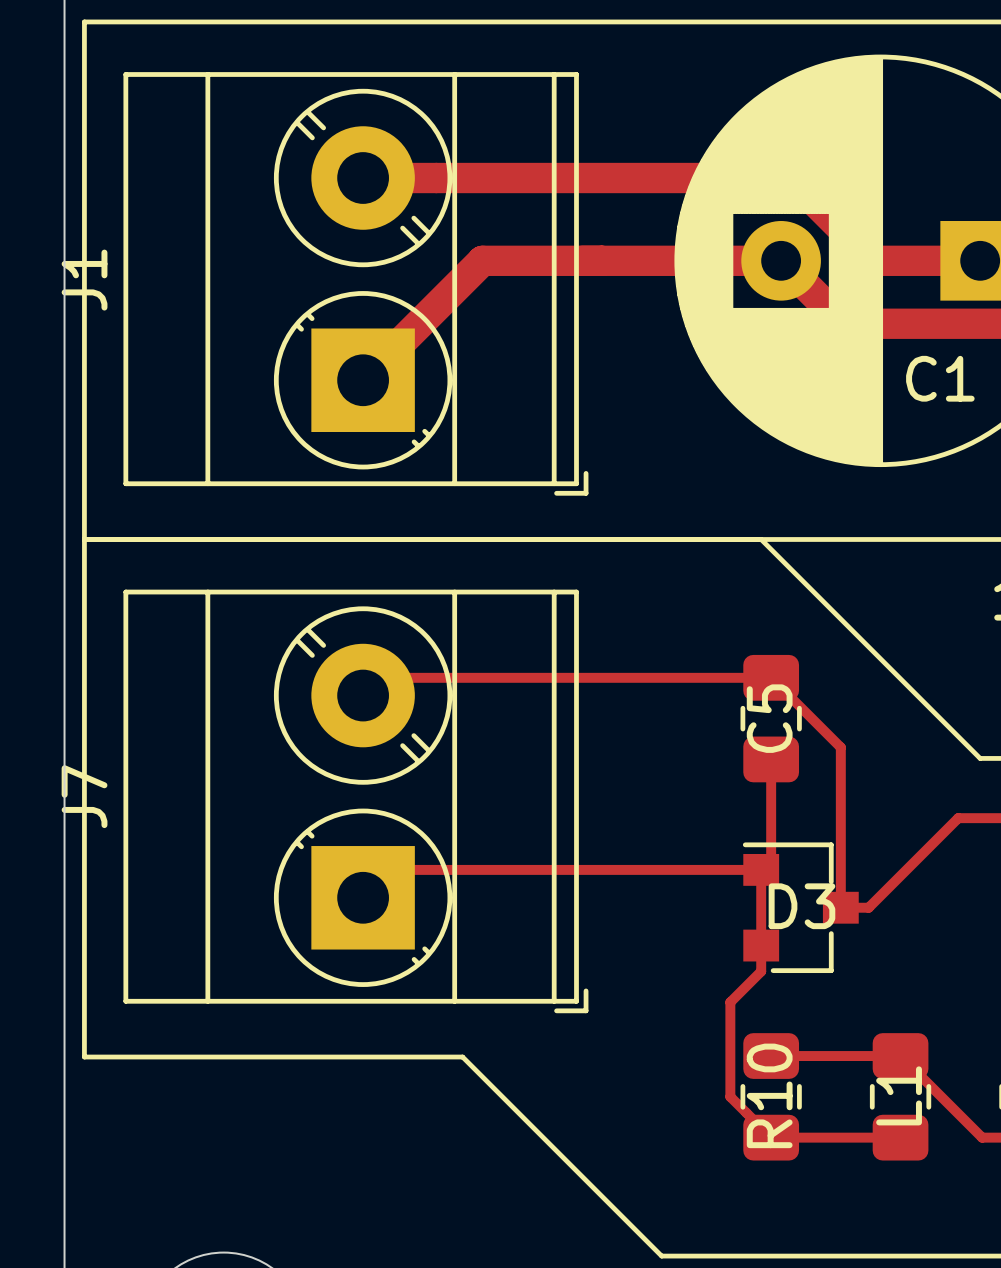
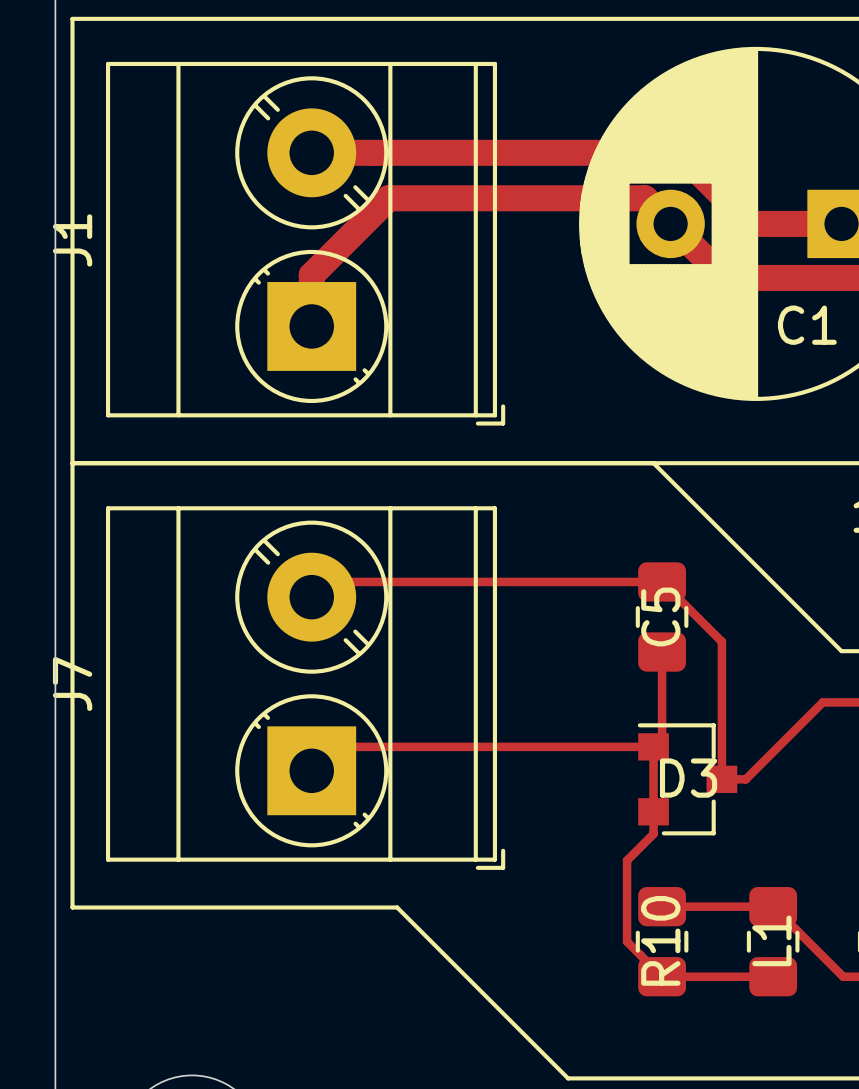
top track: (781, 260) (482, 260) (363, 380) -> (670, 223) (645, 198) (388, 198) (311, 275) (311, 326)

